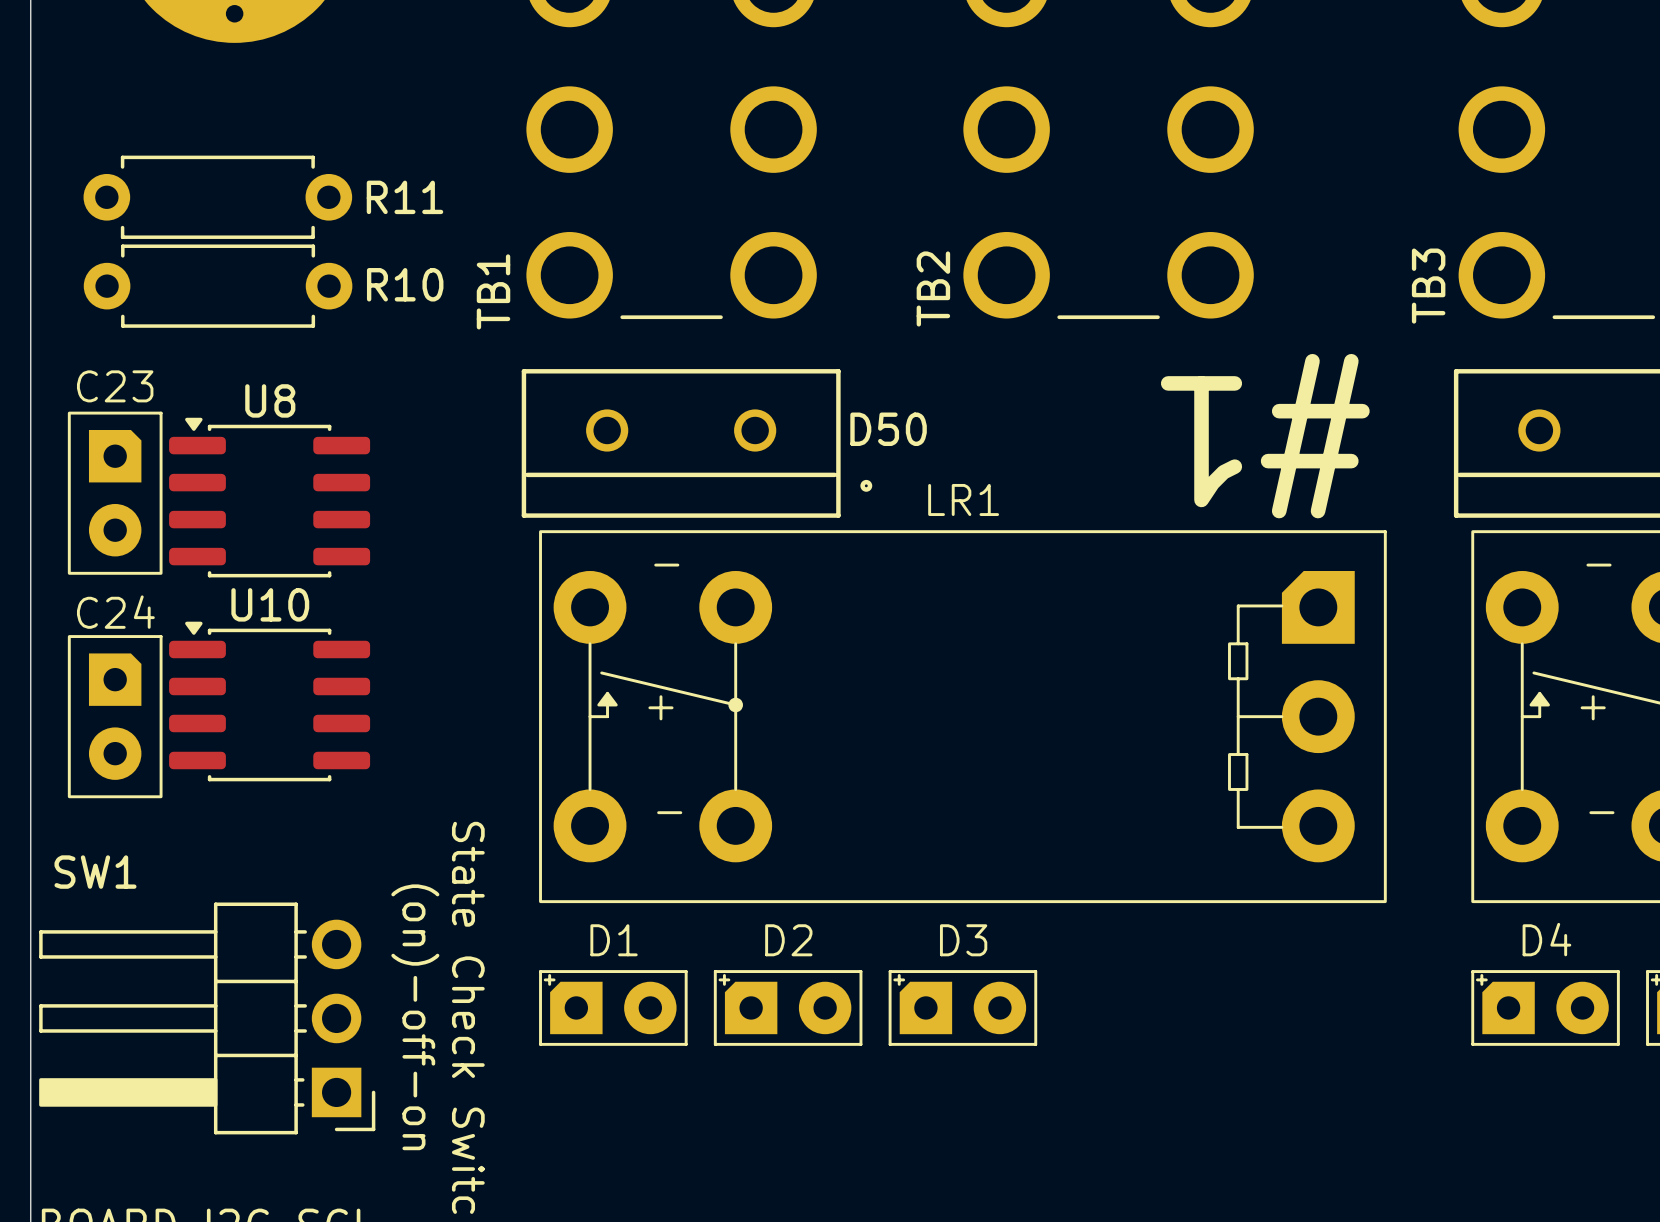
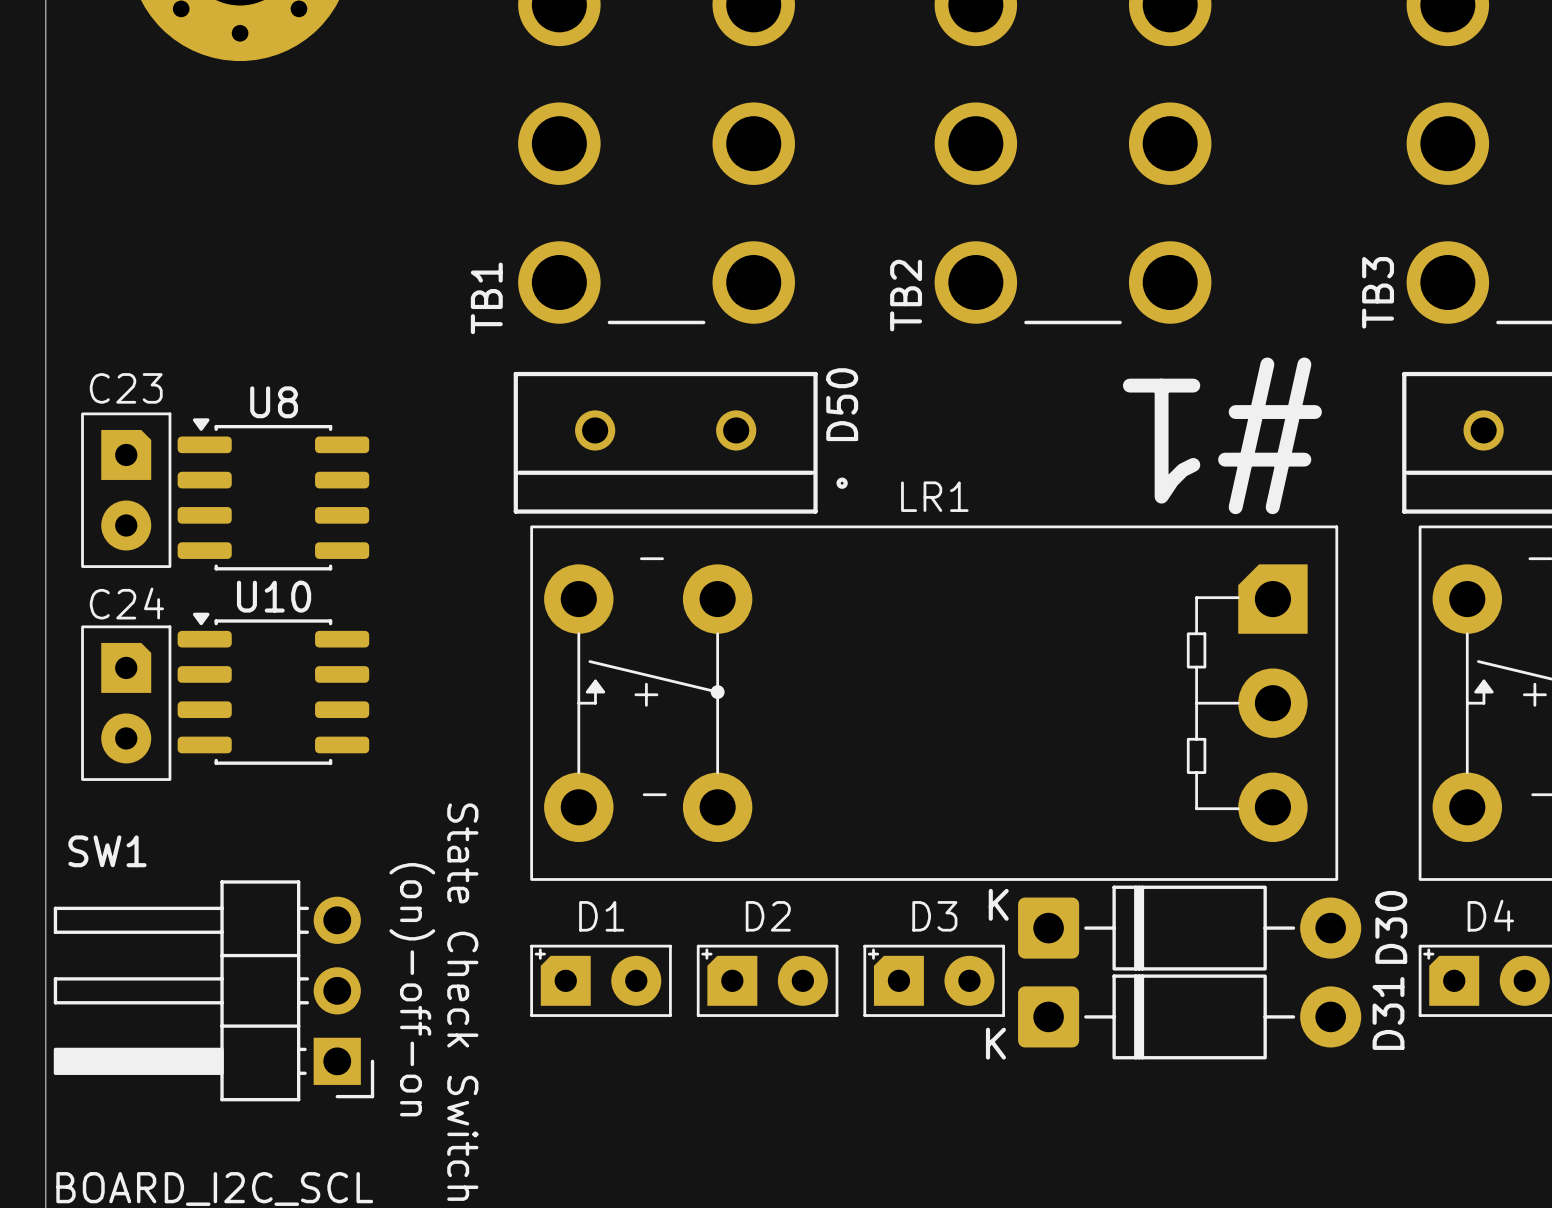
R11: (217, 197) -> none
R10: (218, 286) -> none
D50 name rotation: 0° (888, 429) -> 90° counterclockwise (842, 404)
D30: none -> (1189, 928)
D31: none -> (1189, 1016)

